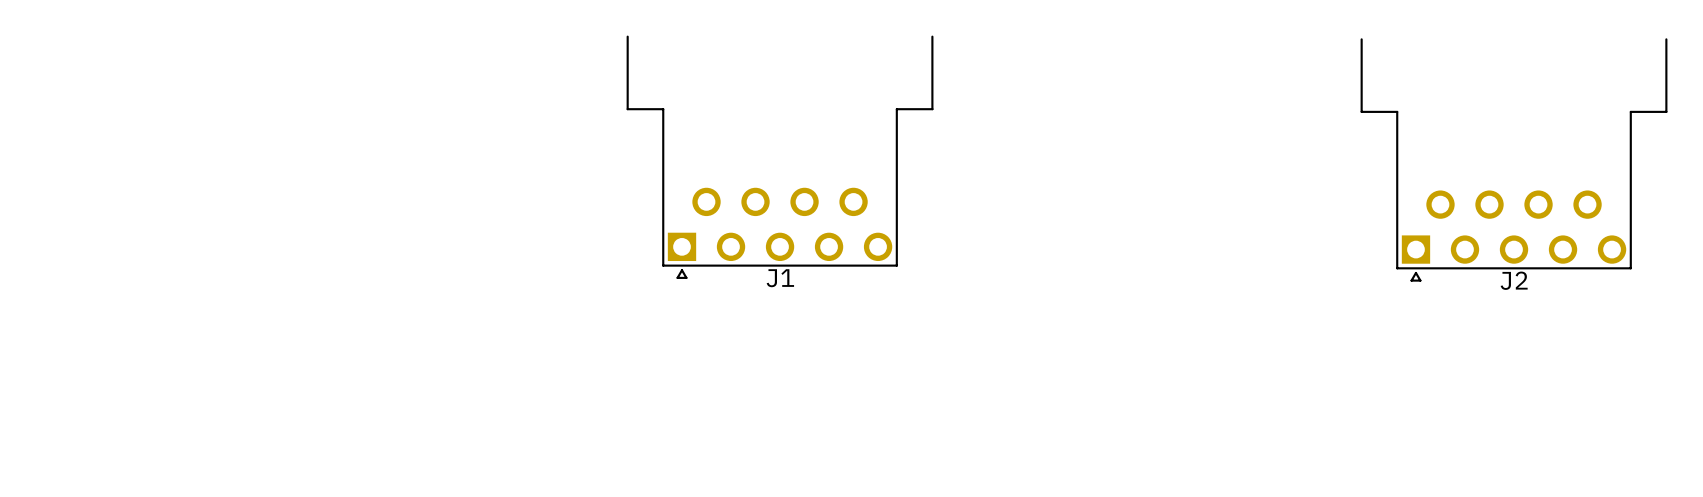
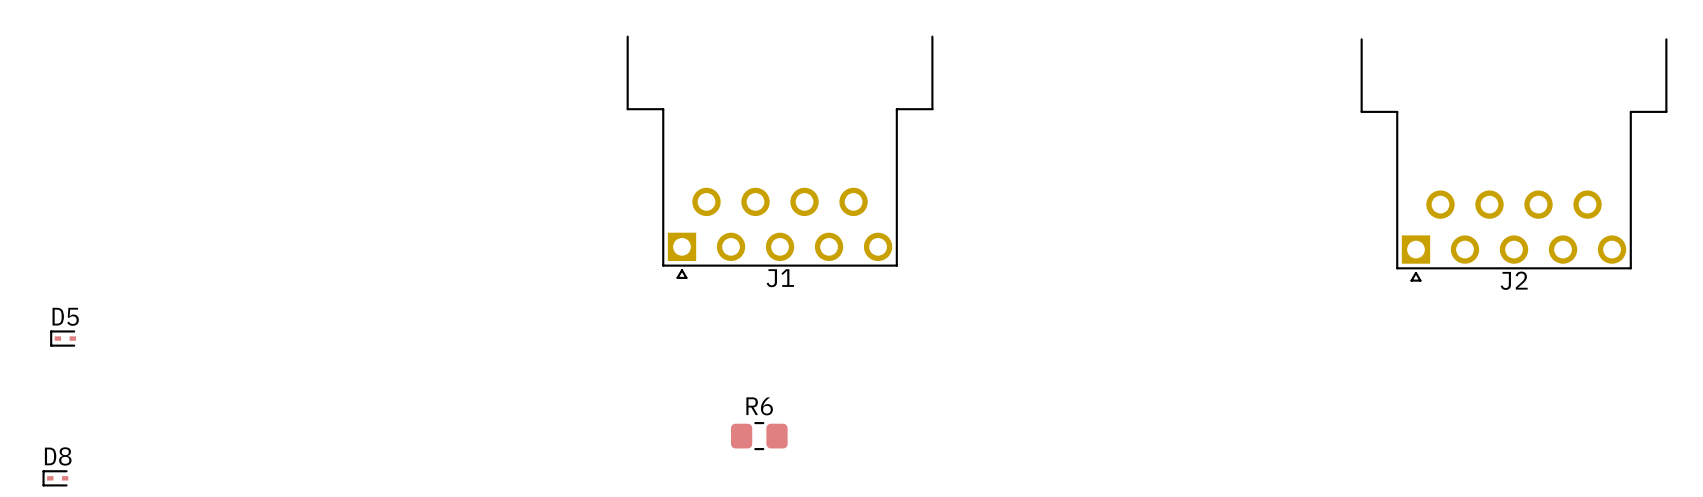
D5: none -> (63, 338)
R6: none -> (759, 436)
D8: none -> (55, 478)

